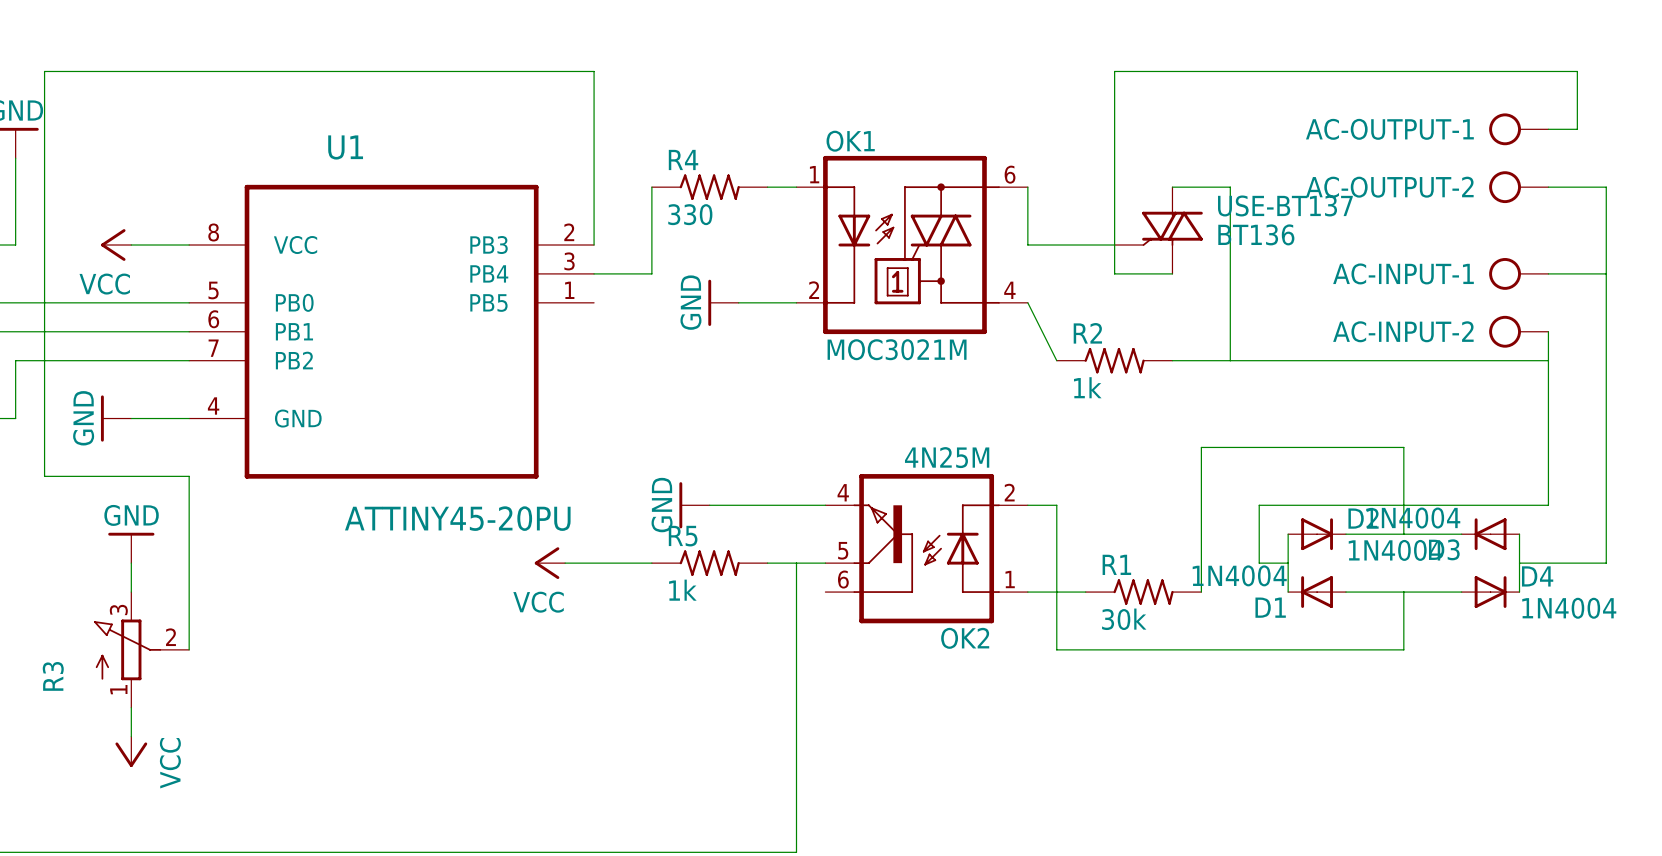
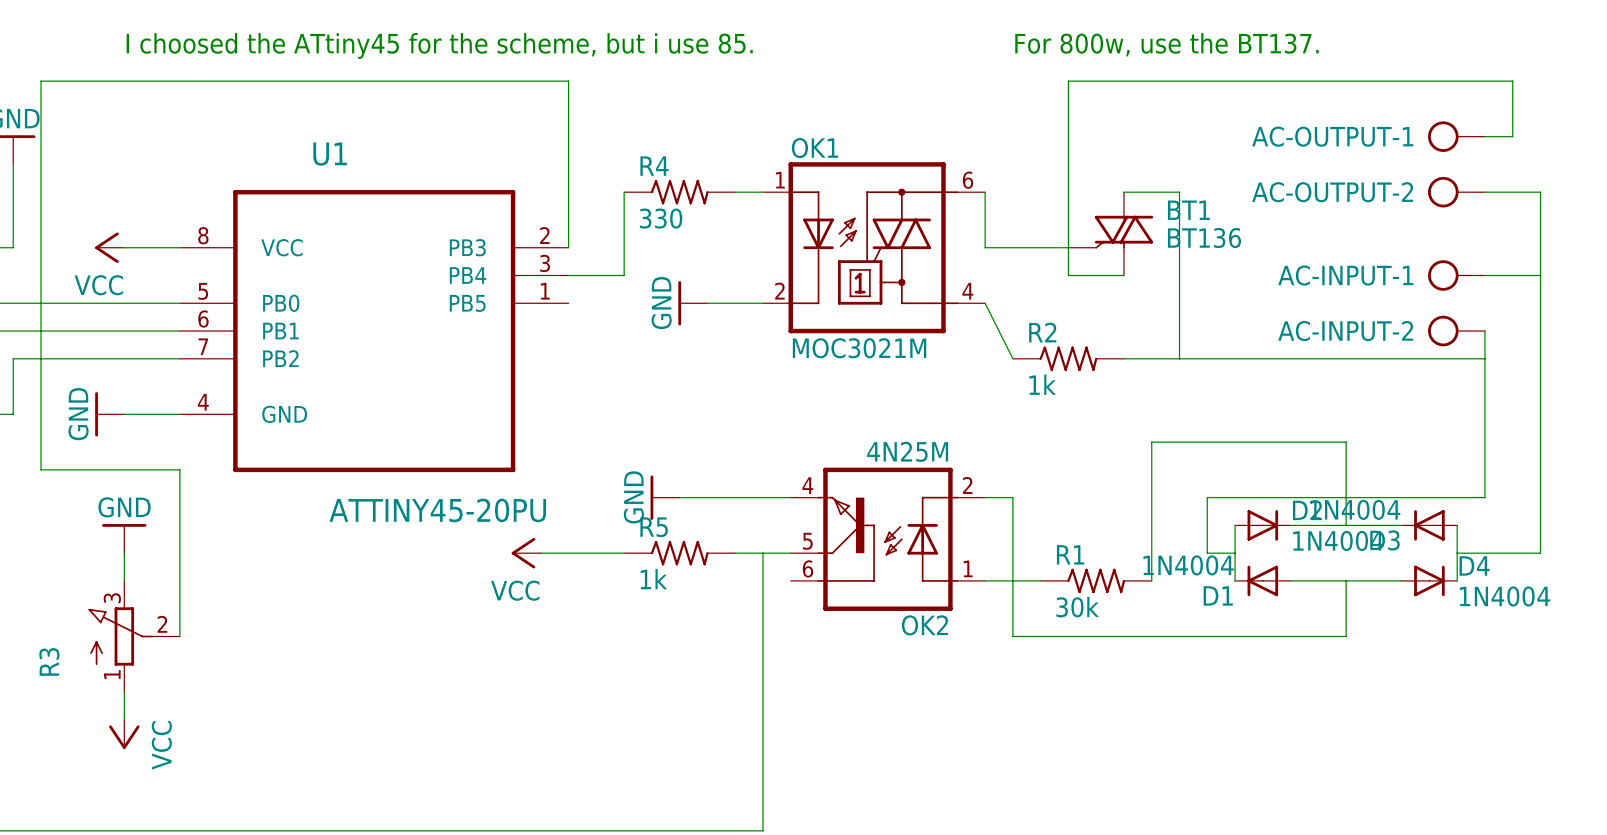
text: none -> For 800w, use the BT137. (1166, 44)
text: none -> I choosed the ATtiny45 for the scheme, but i use 85. (439, 45)
USE-BT137 name: USE-BT137 (1285, 205) -> BT1 (1188, 210)

